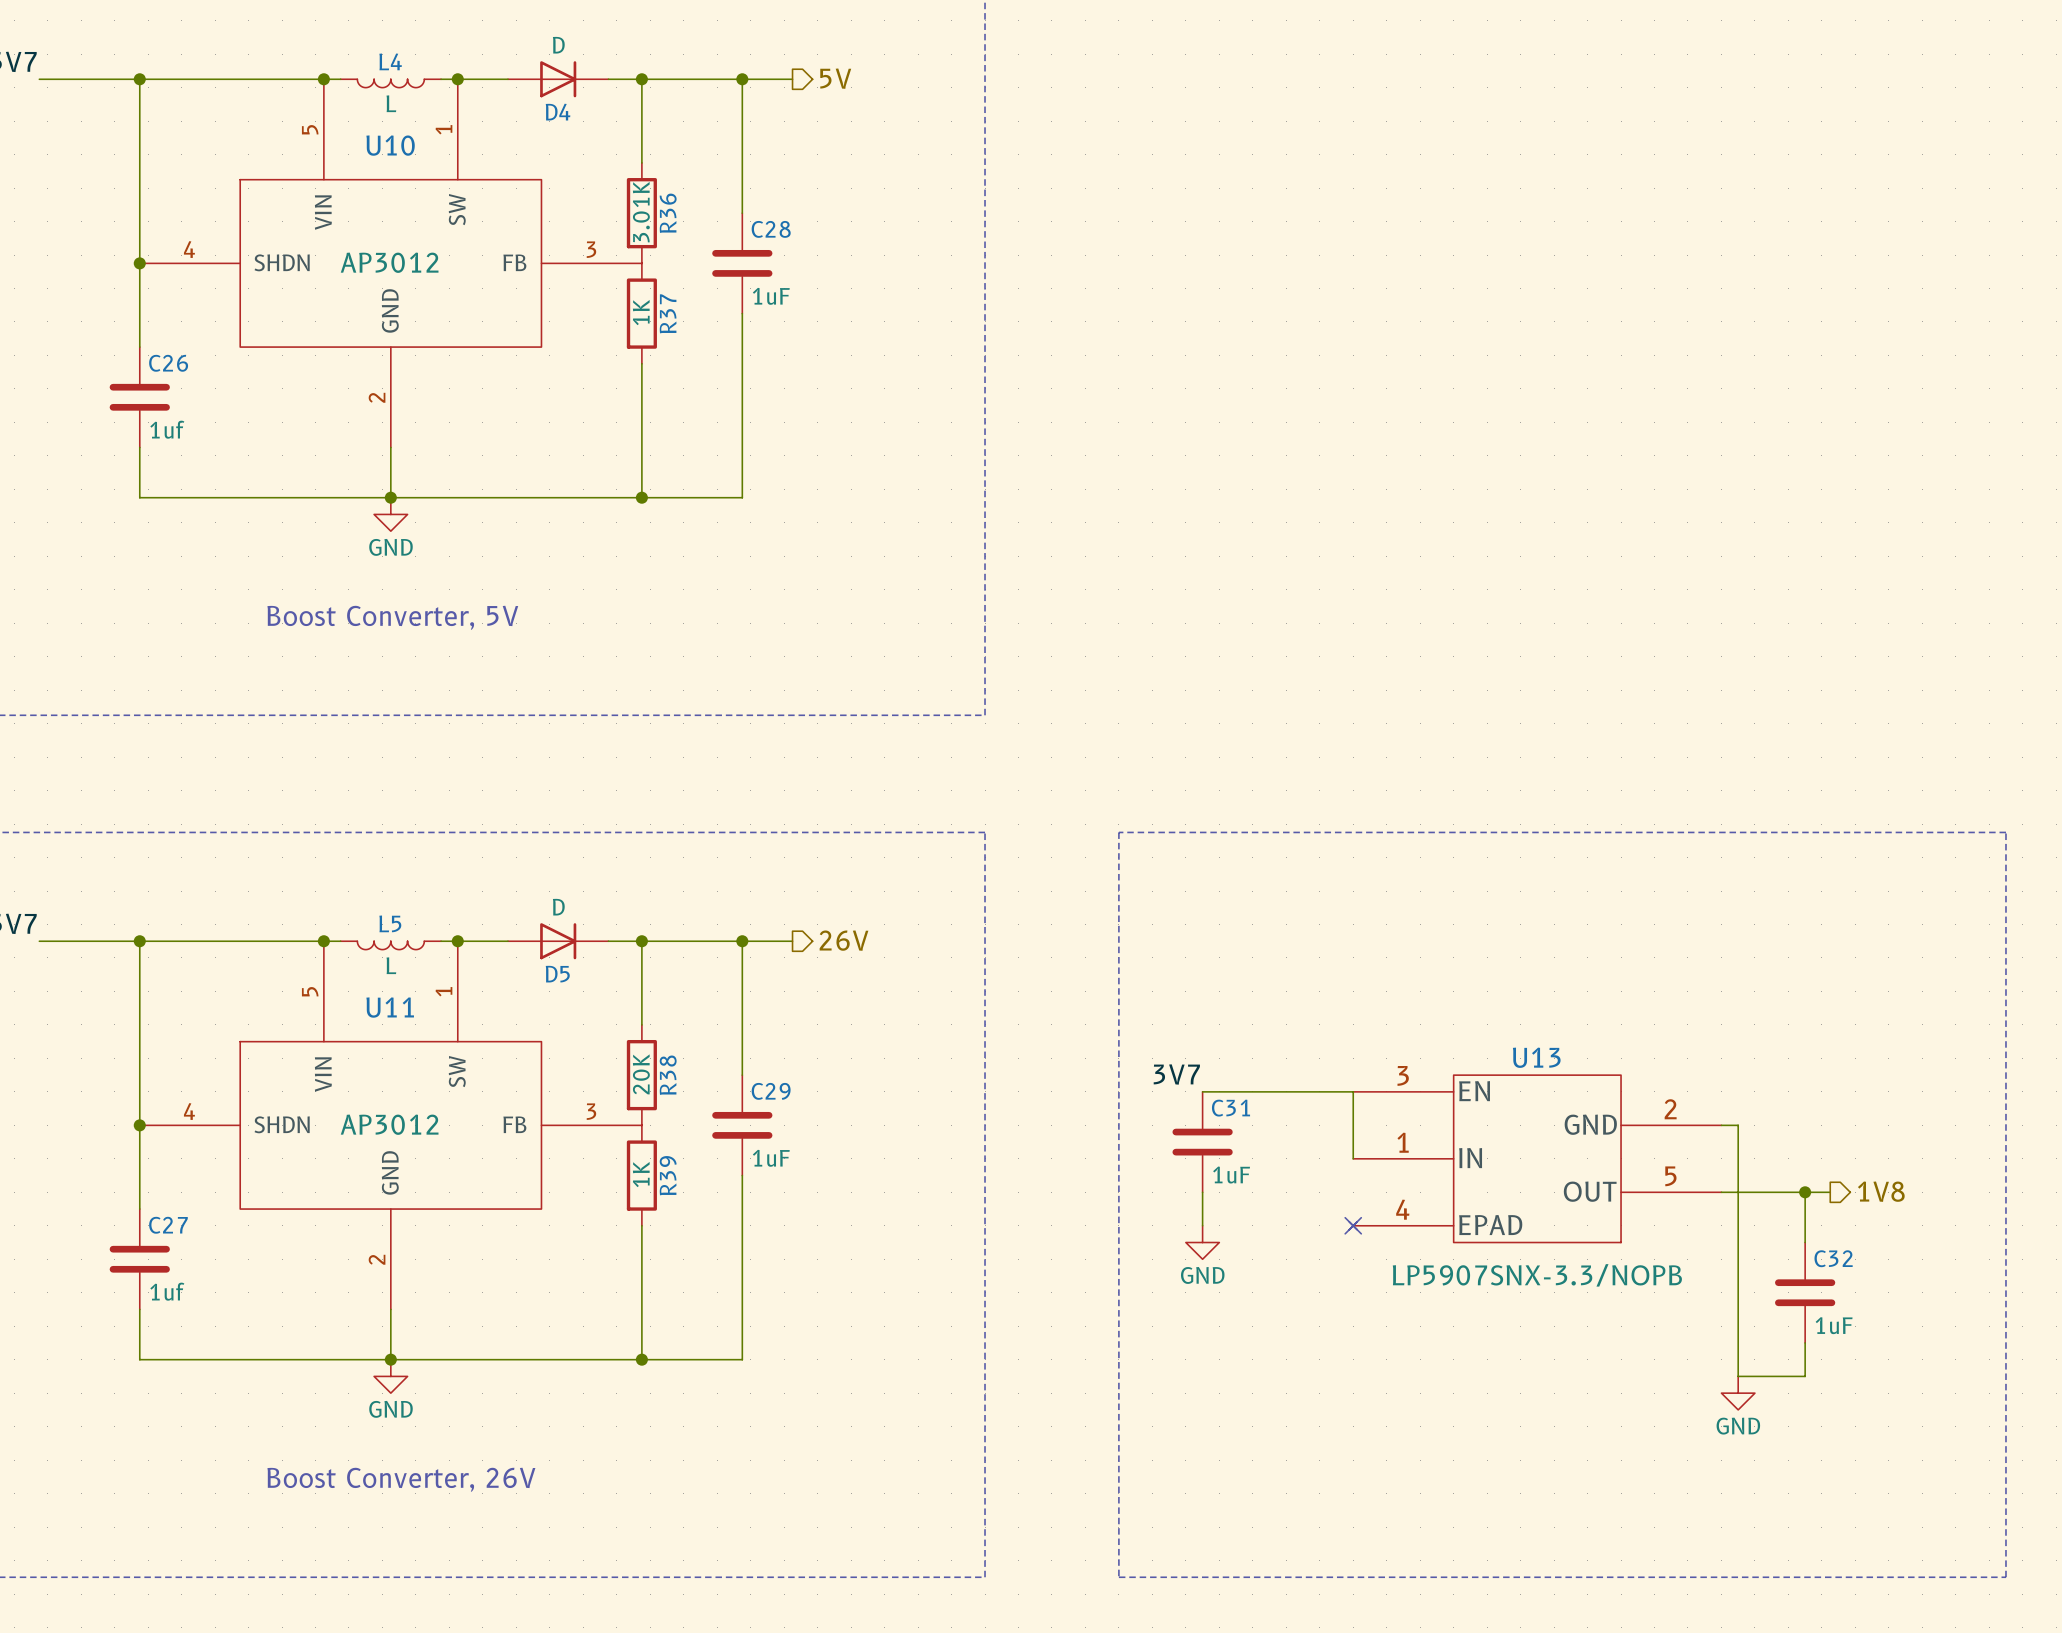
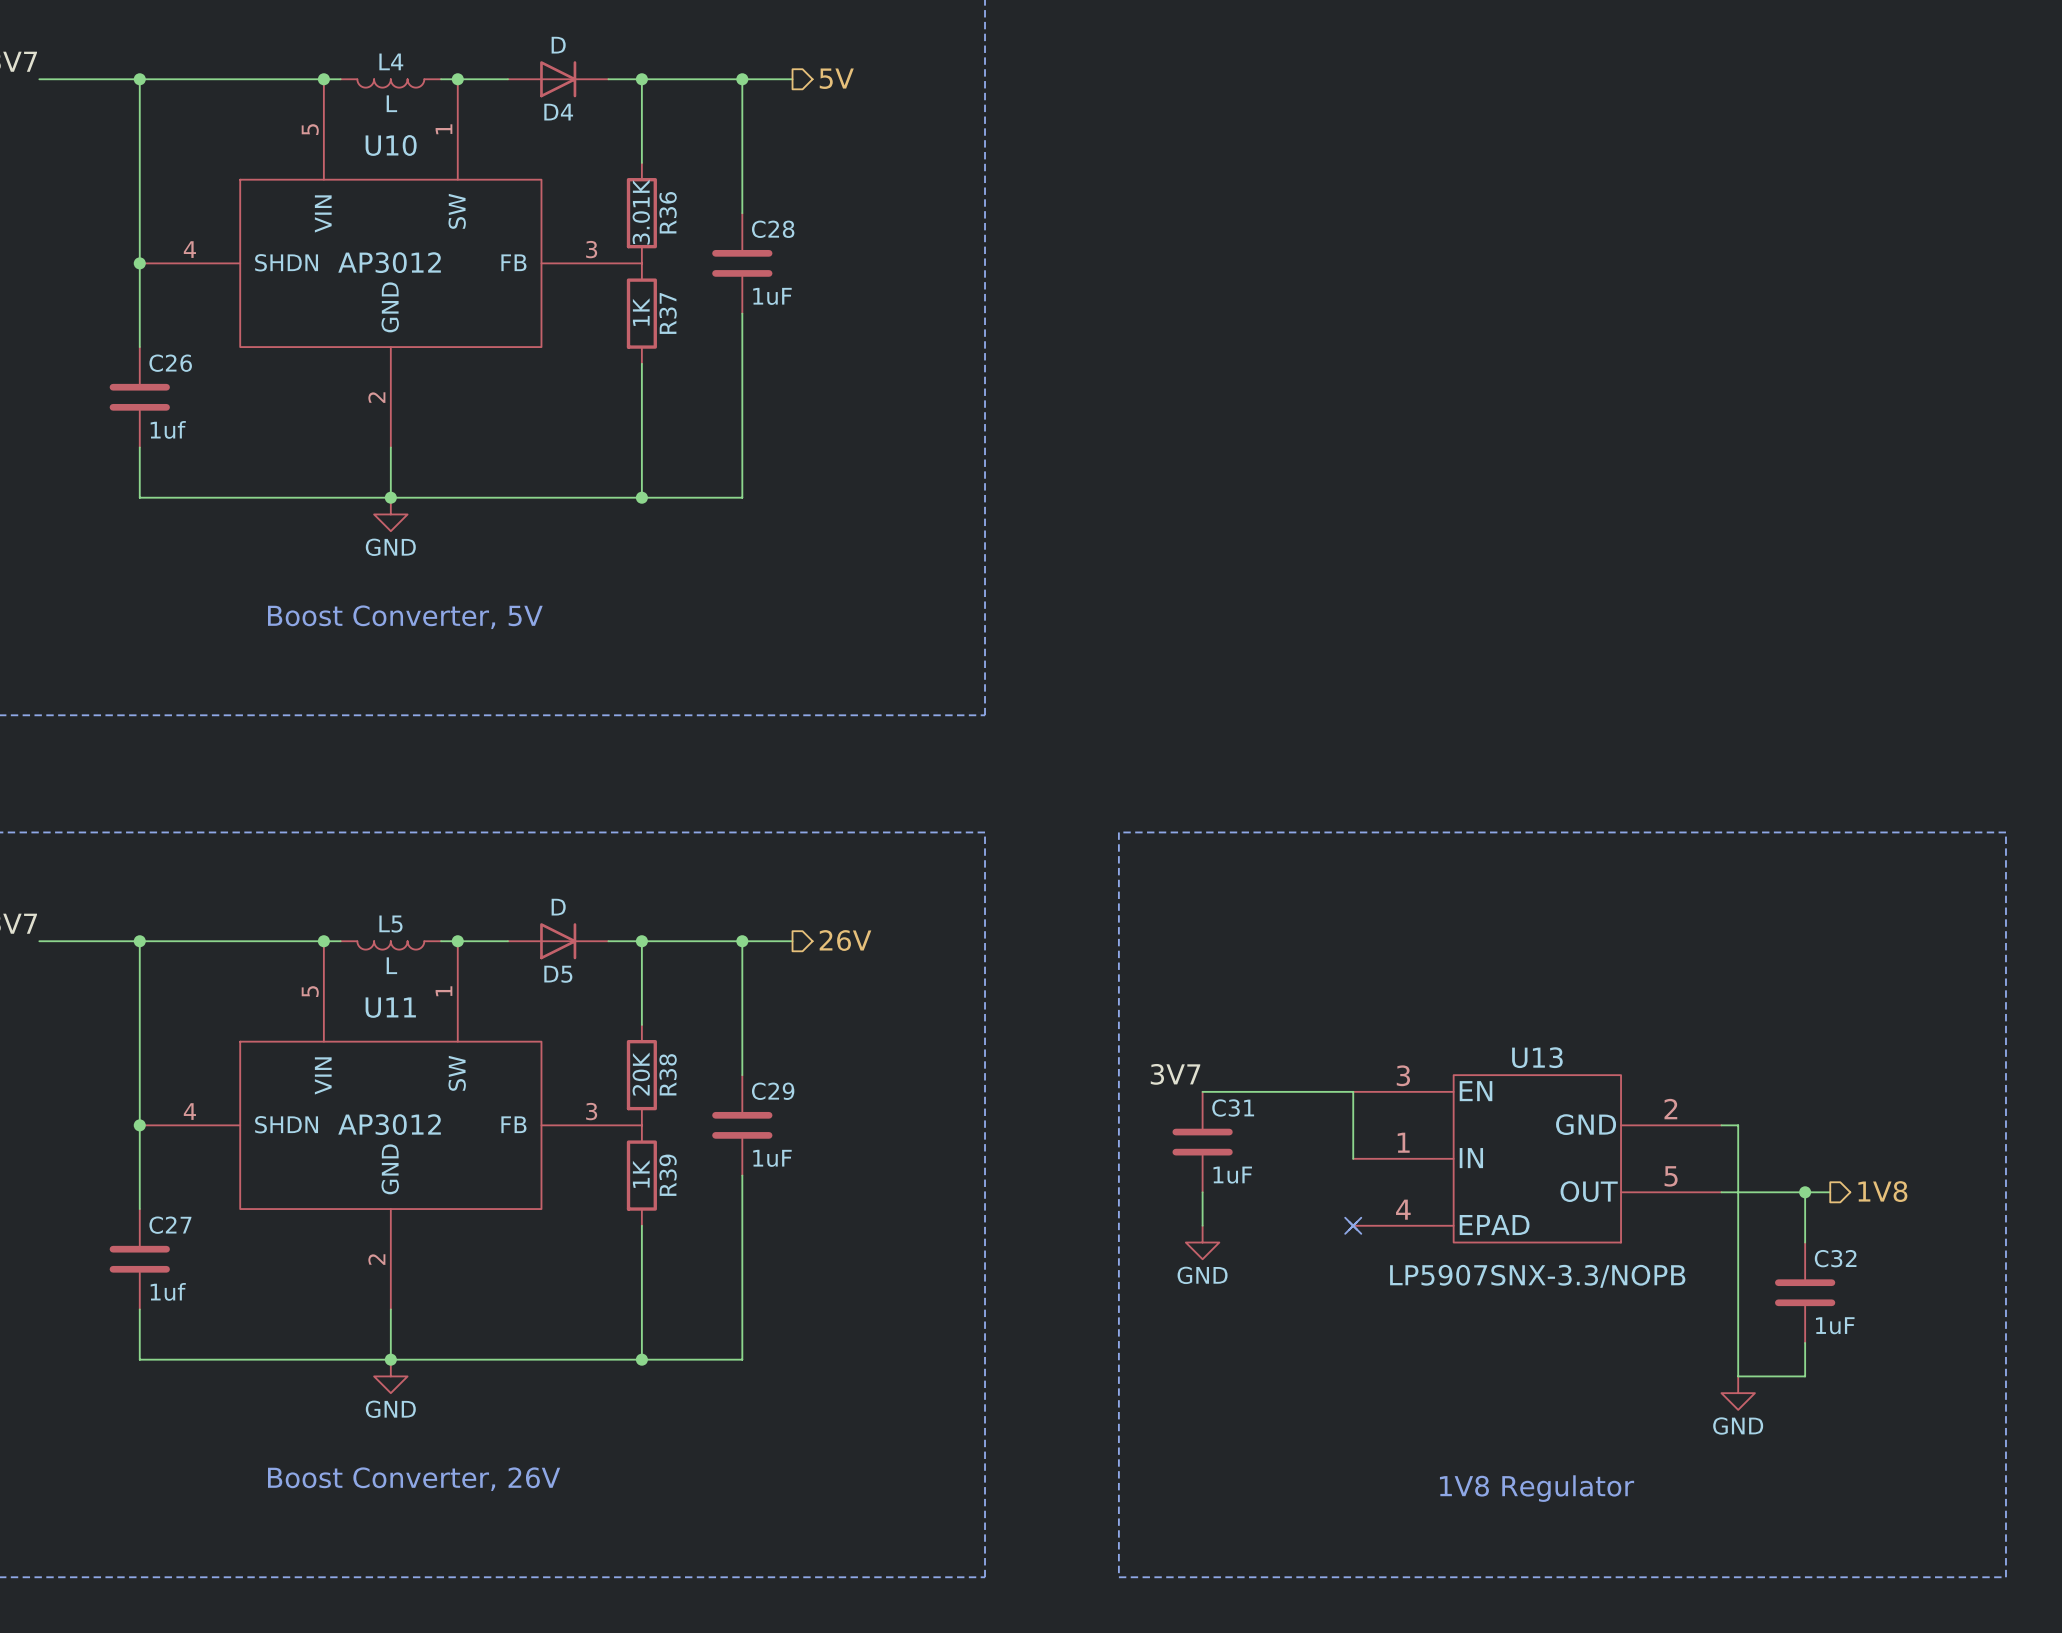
text: none -> 1V8 Regulator (1537, 1488)

